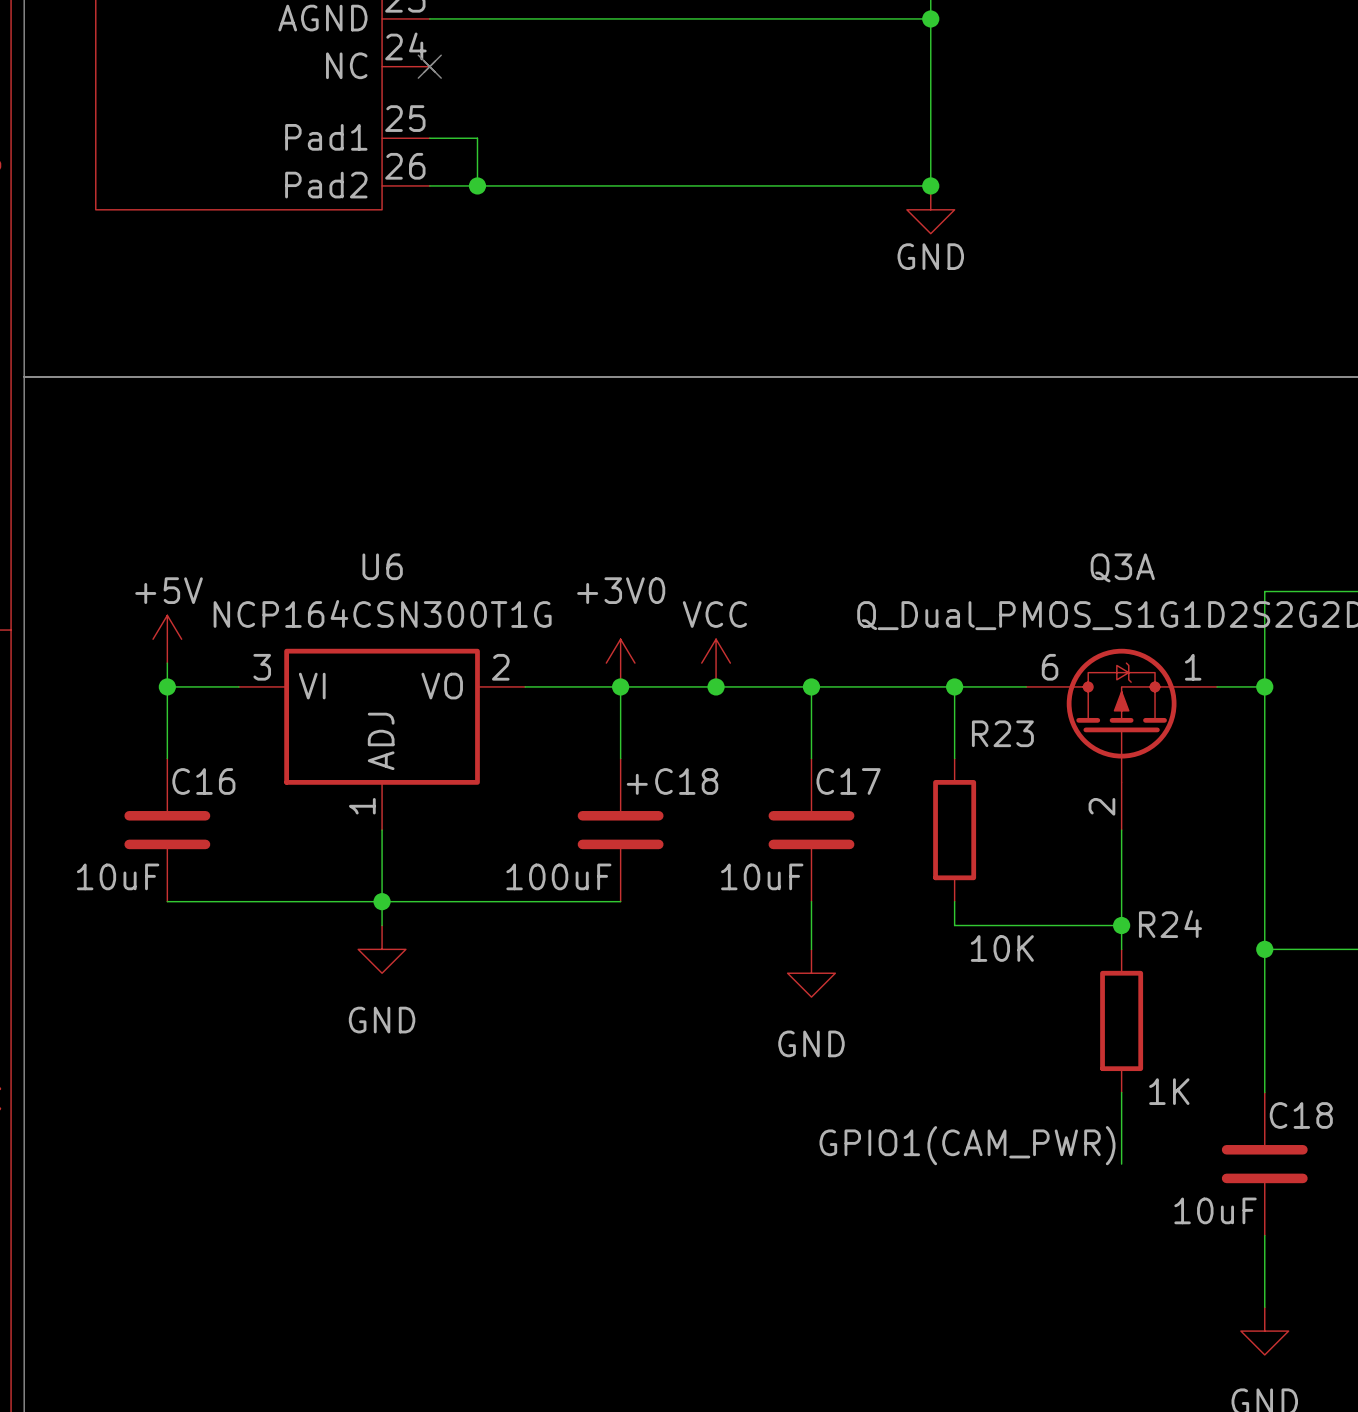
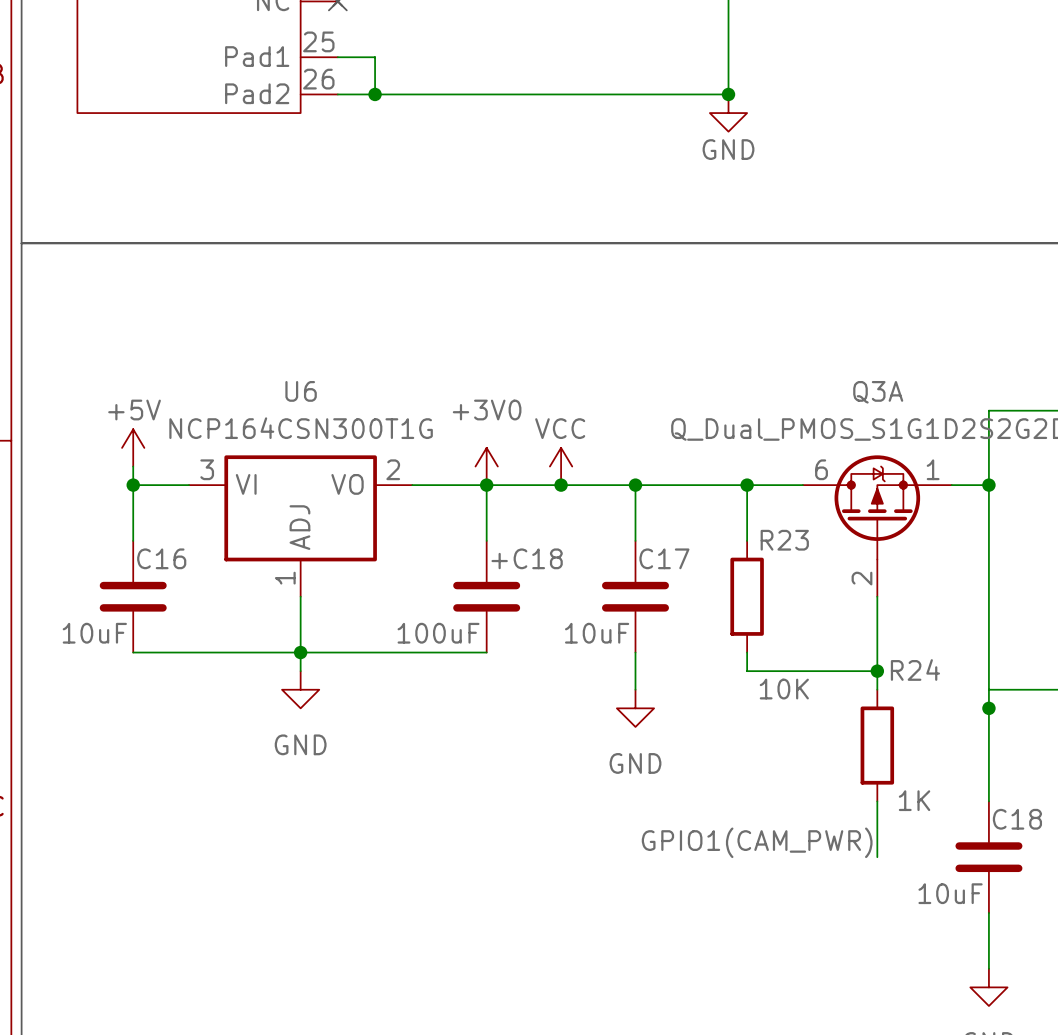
R23 name position: R23 (1002, 733) -> R23 (784, 540)
junction position: (1264, 949) -> (988, 708)

